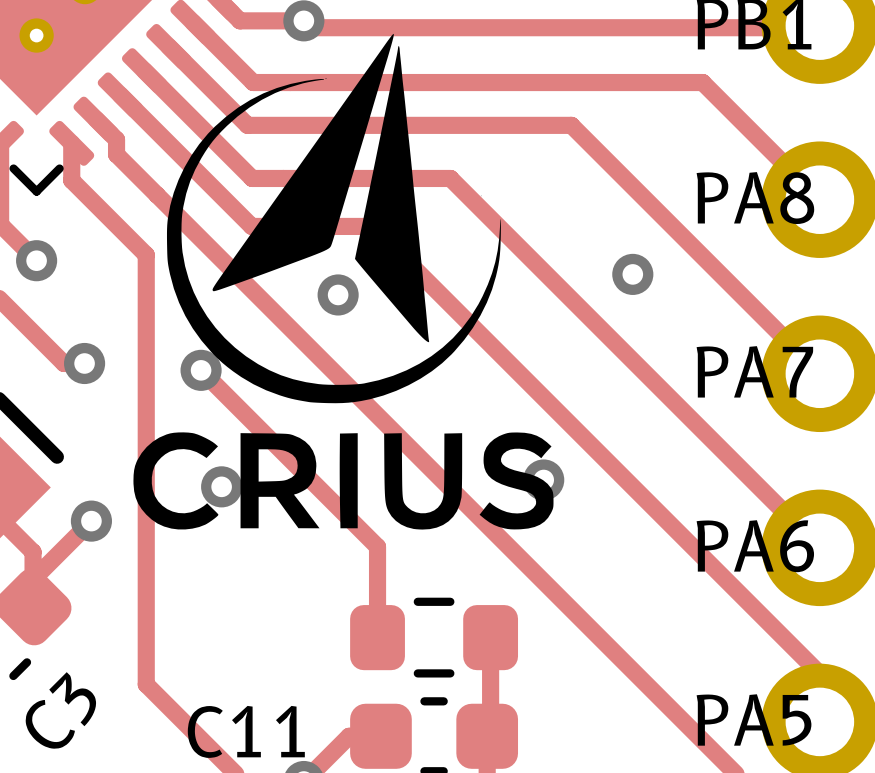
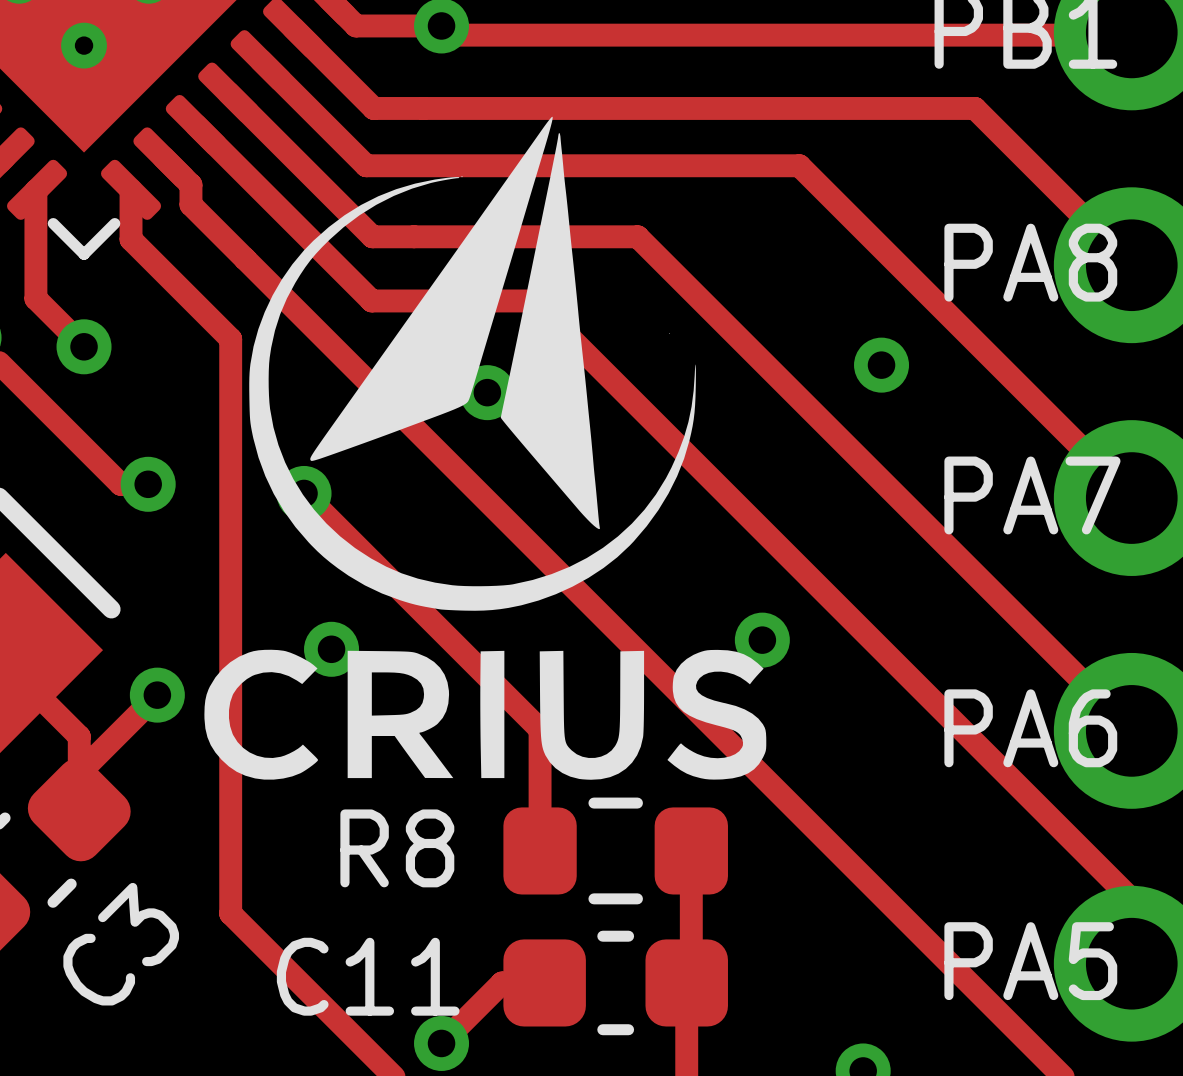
drawing position: (343, 281) -> (485, 448)
R8 name: none -> R8 (397, 848)

